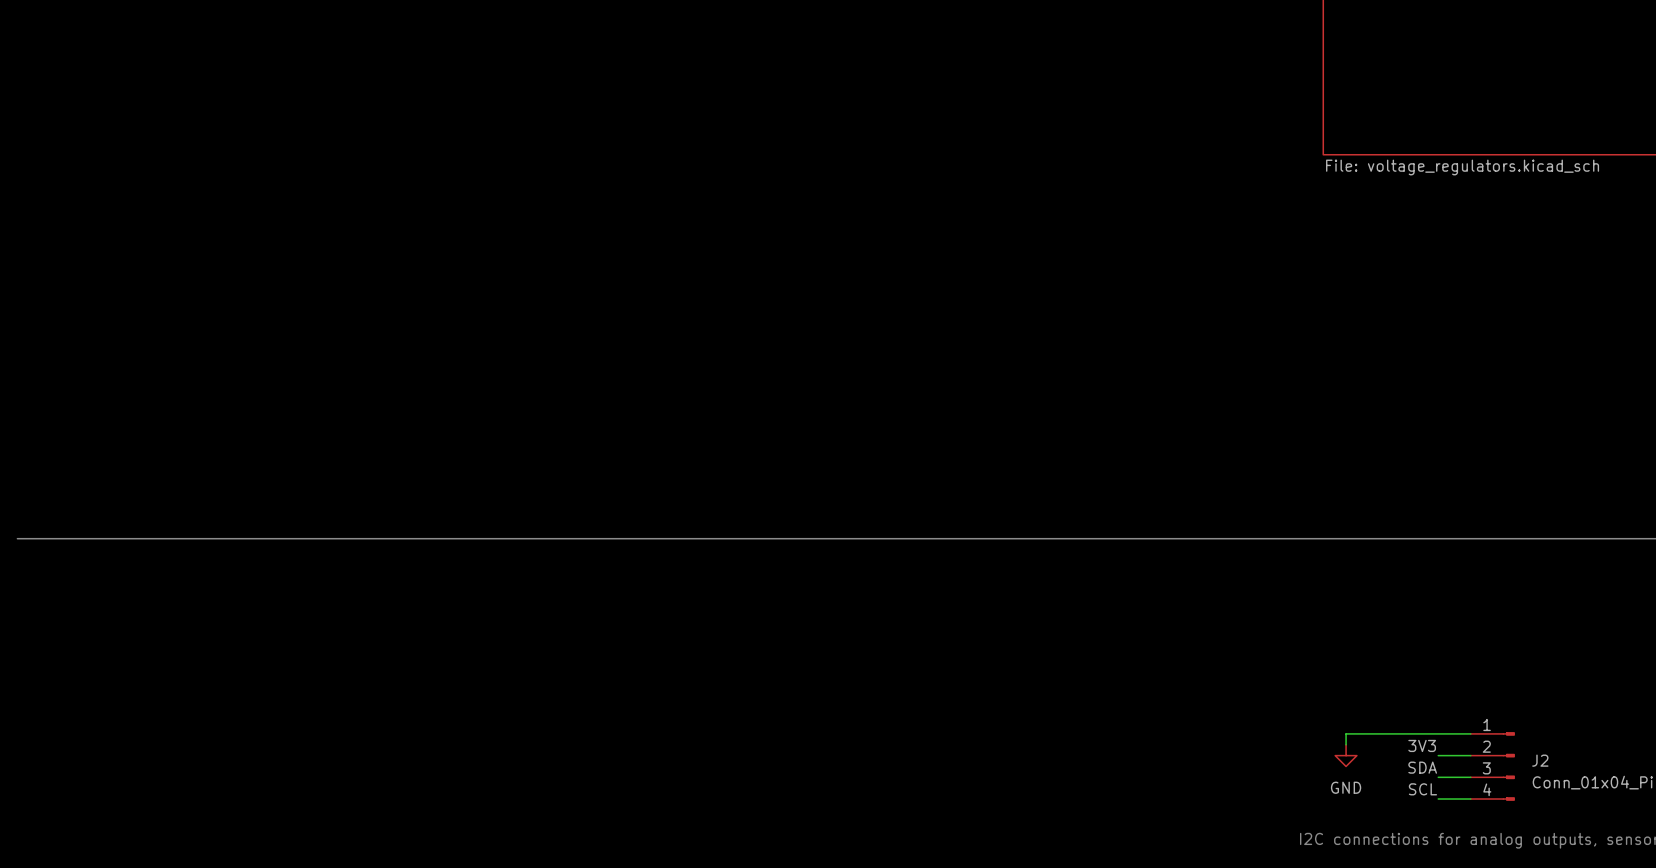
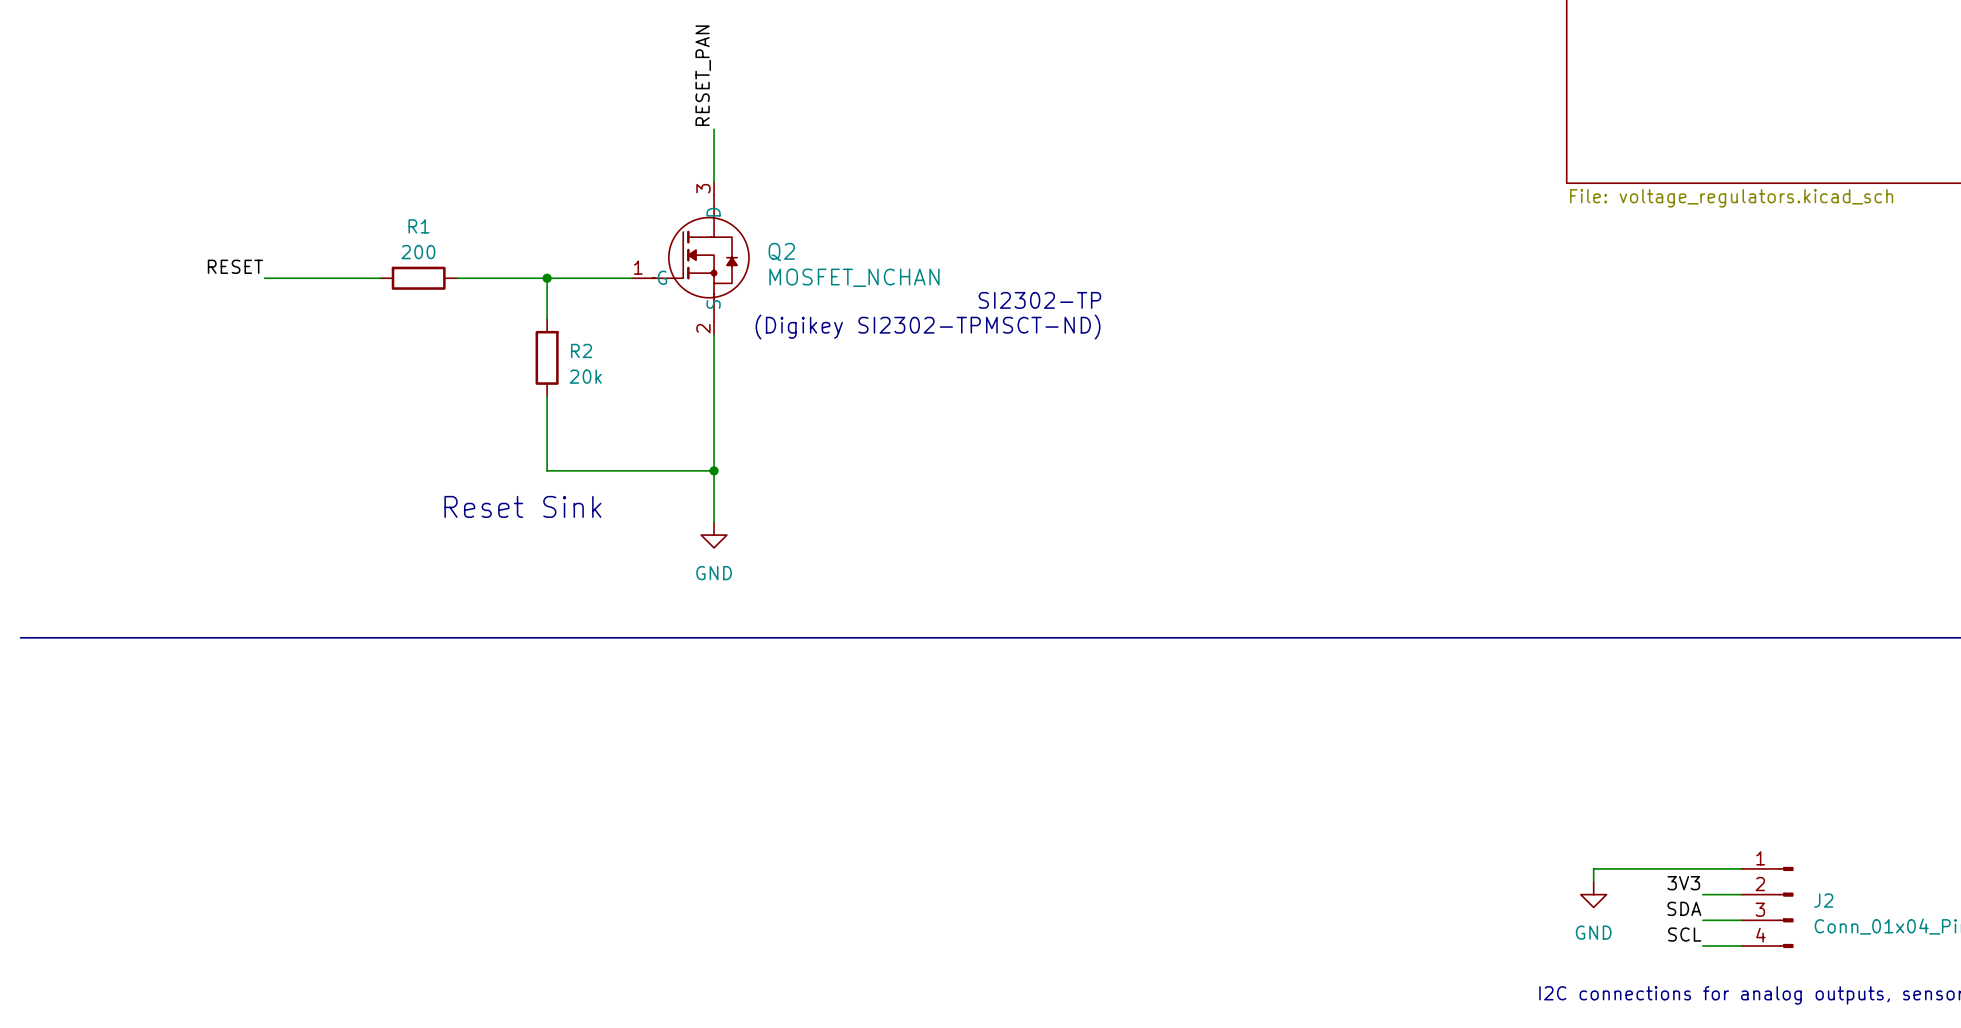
label: none -> RESET_PAN (703, 75)
wire: none -> (714, 129) (714, 181)
Q2: none -> MOSFET_NCHAN (690, 258)
label: none -> RESET (235, 266)
wire: none -> (264, 278) (380, 278)
R1: none -> 200 (418, 278)
wire: none -> (457, 278) (631, 278)
wire: none -> (547, 278) (547, 319)
junction: none -> (547, 278)
text: none -> SI2302-TP (1039, 300)
text: none -> (Digikey SI2302-TPMSCT-ND) (928, 327)
wire: none -> (714, 334) (714, 522)
R2: none -> 20k (547, 357)
wire: none -> (547, 396) (547, 470) (714, 470)
junction: none -> (714, 470)
text: none -> Reset Sink (522, 506)
power symbol: none -> GND (714, 535)

